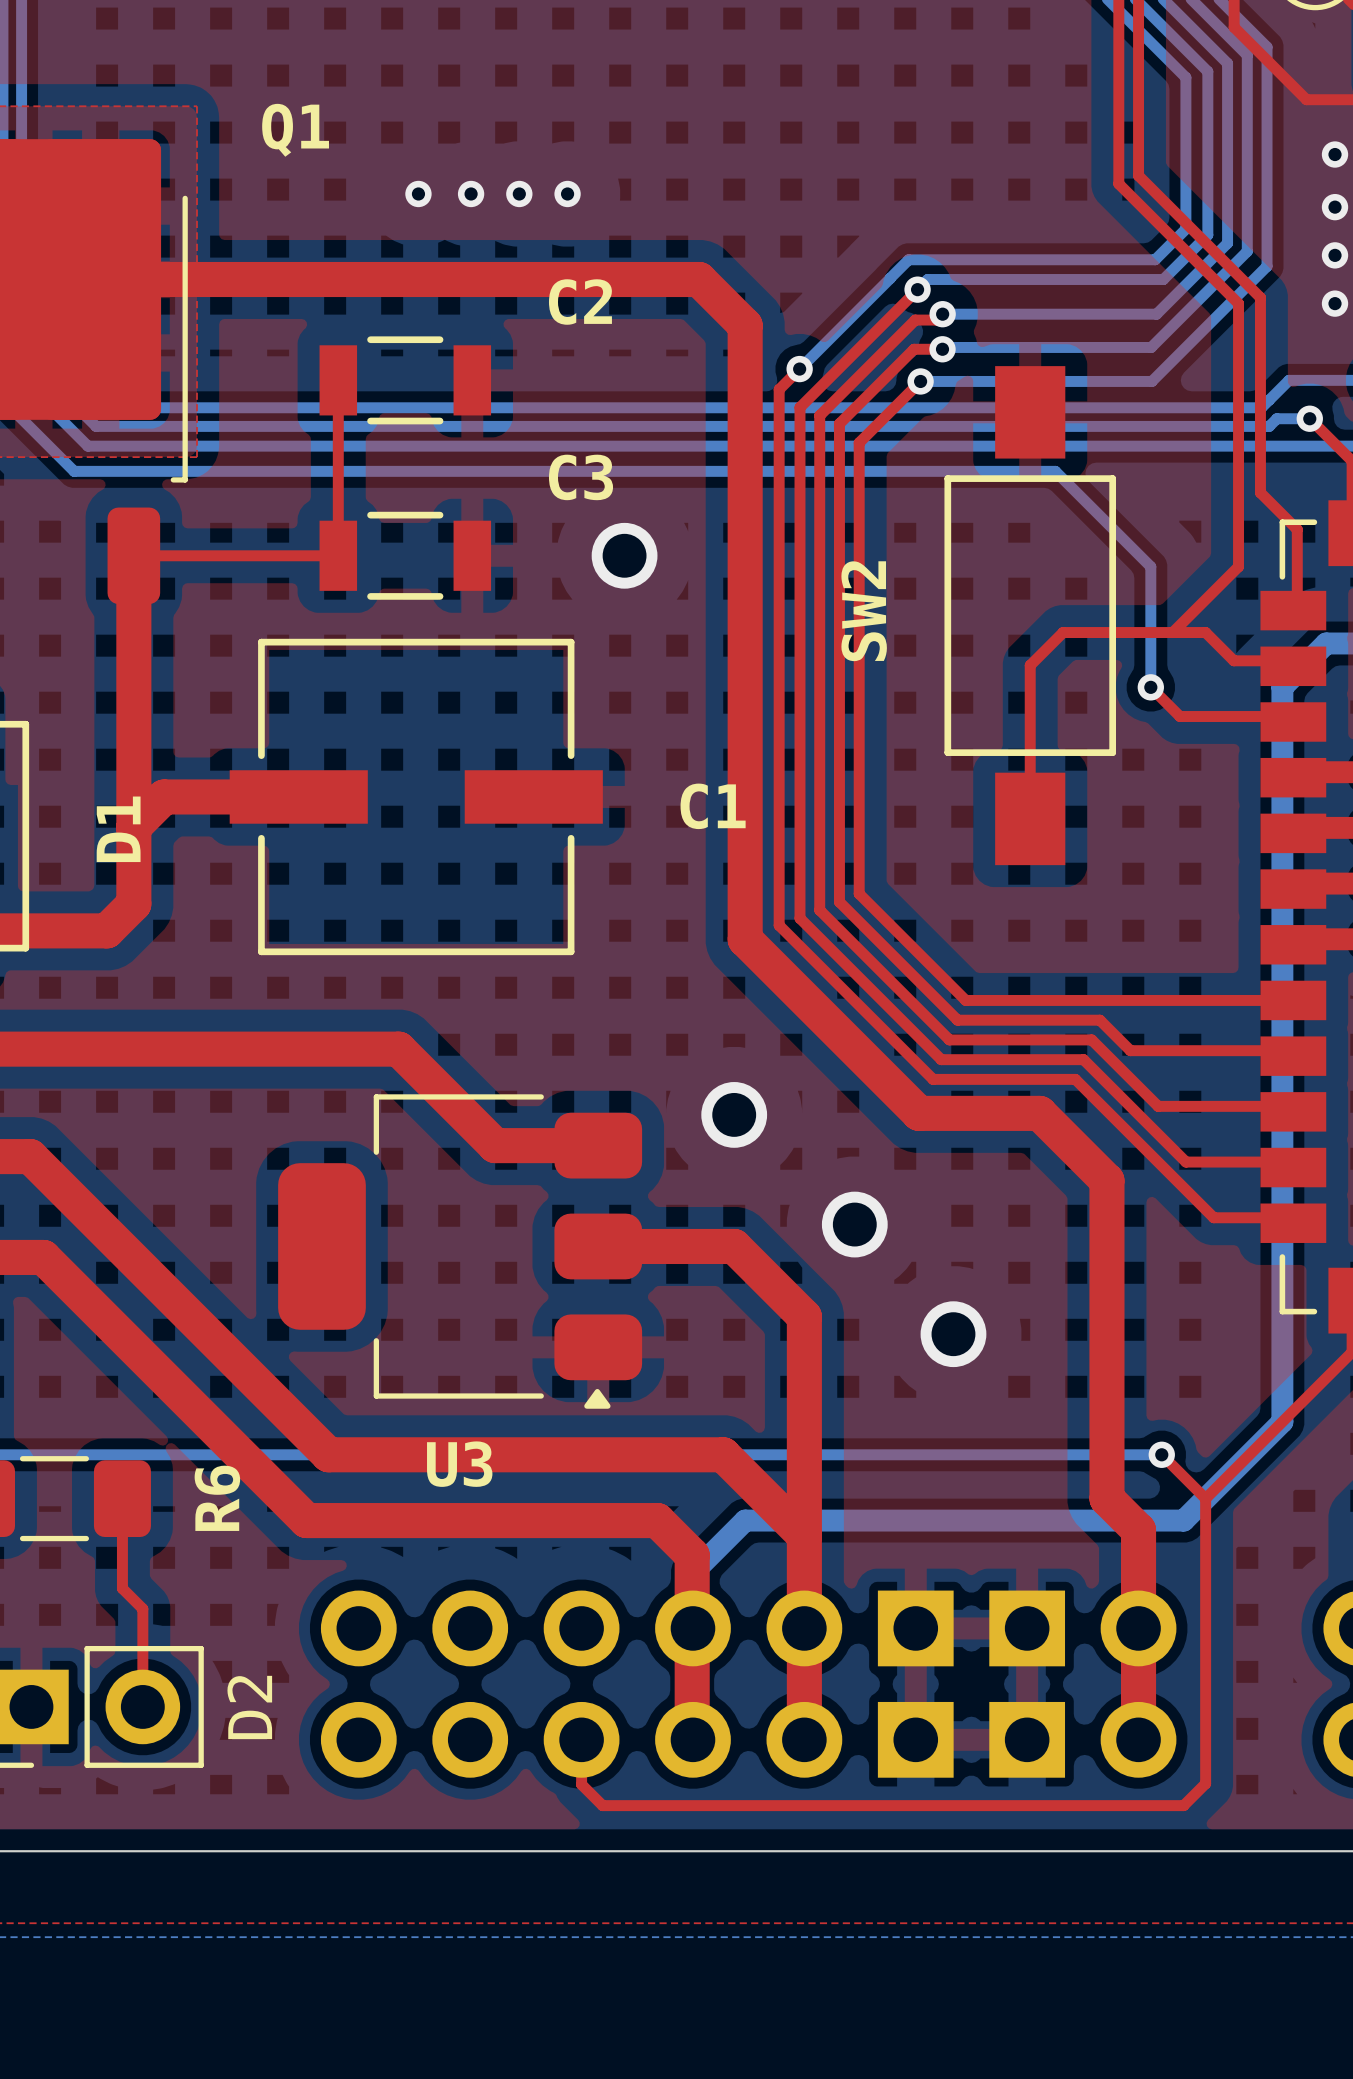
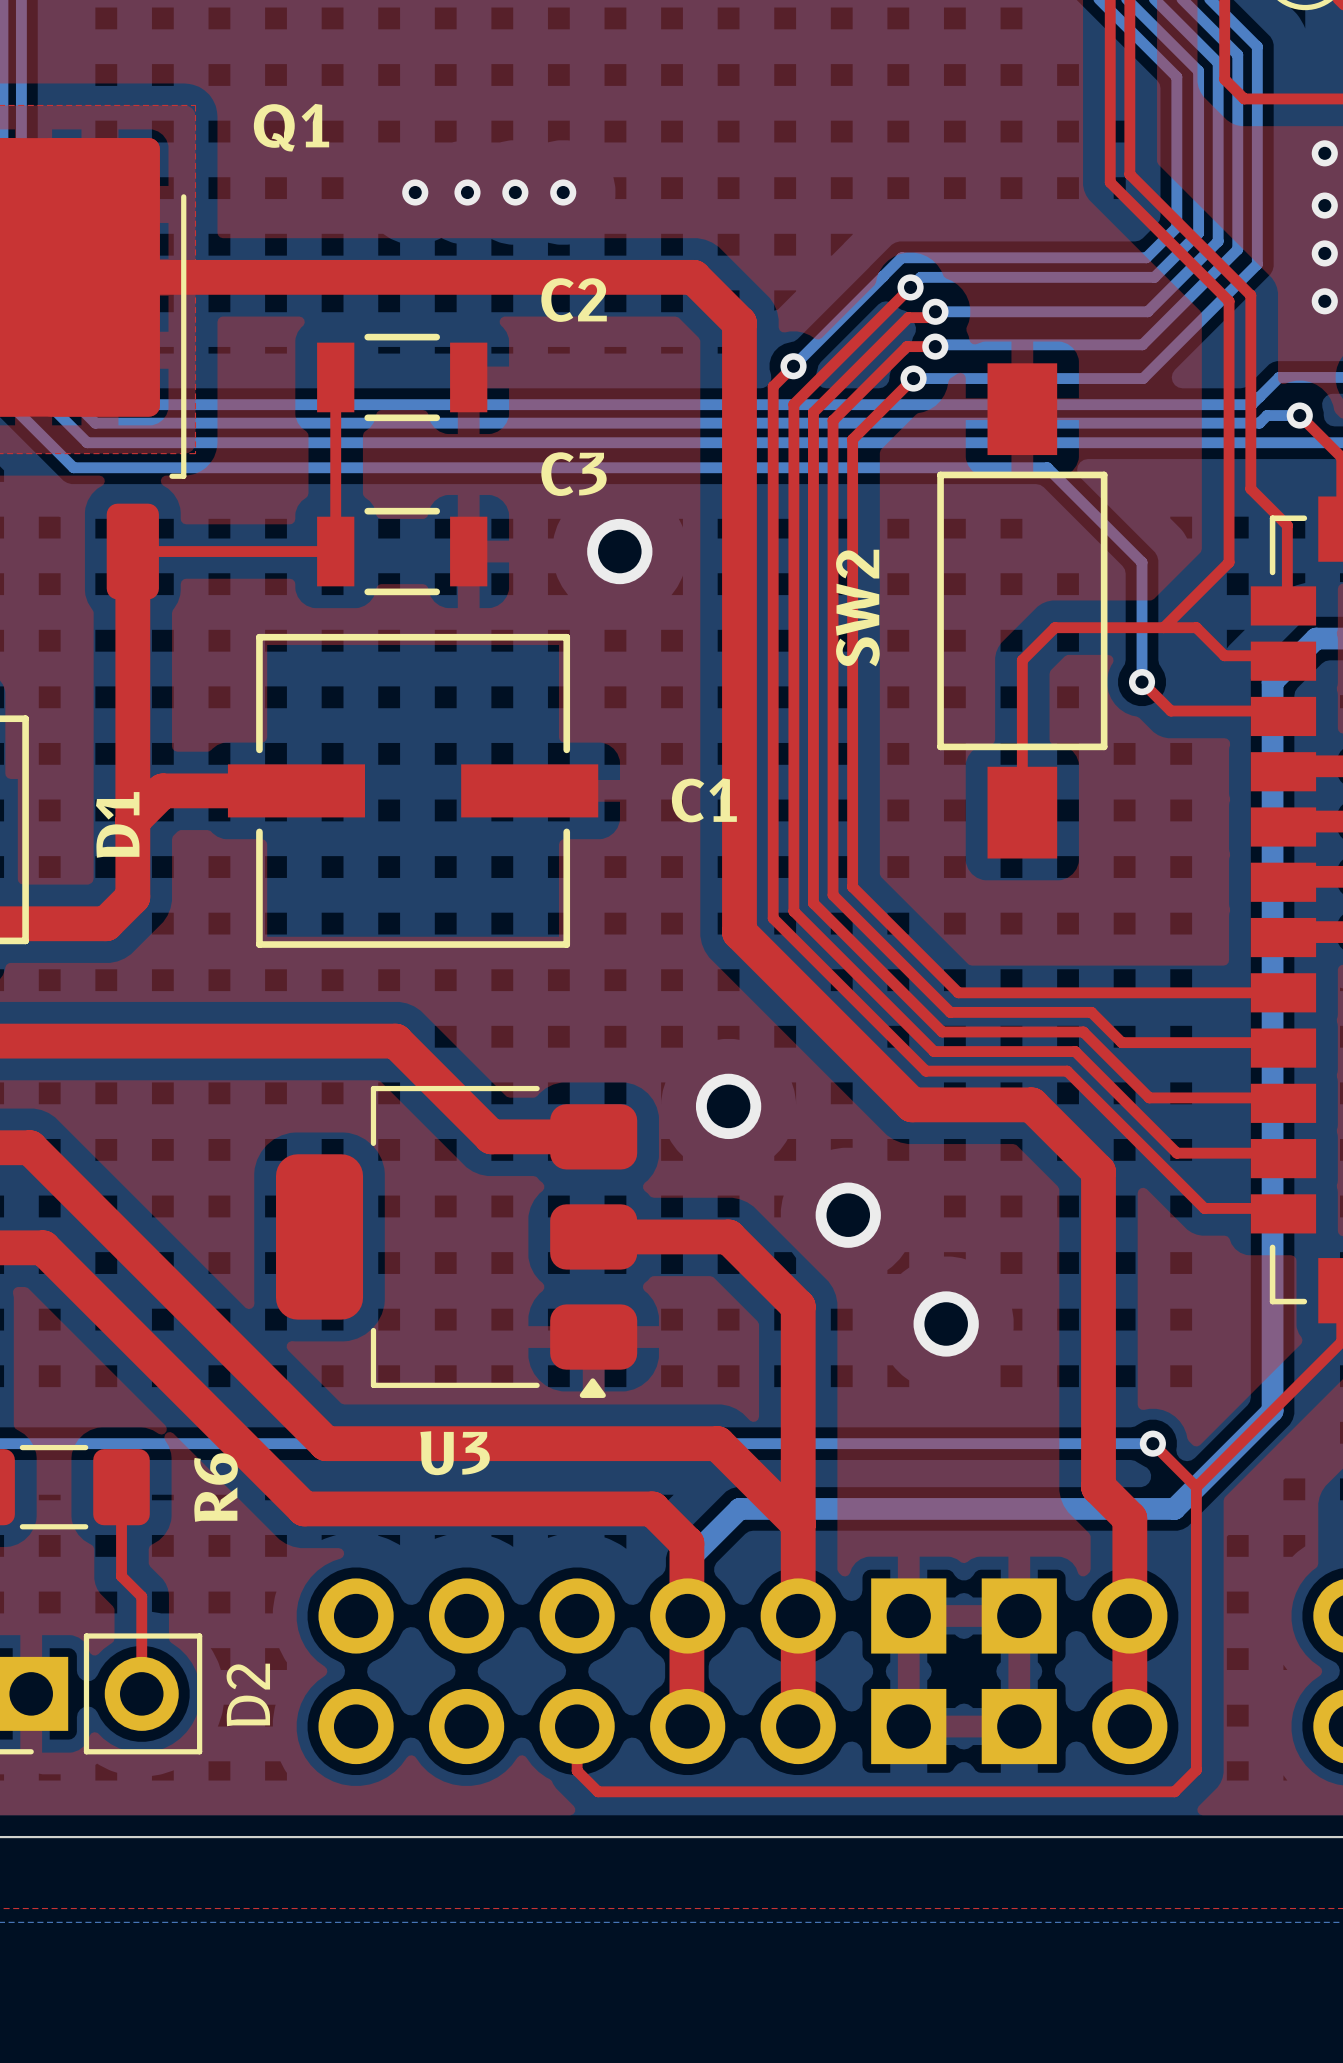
top track: (1234, 27) (1306, 99) -> (1224, 27) (1224, 79) (1244, 98) (1296, 98)

